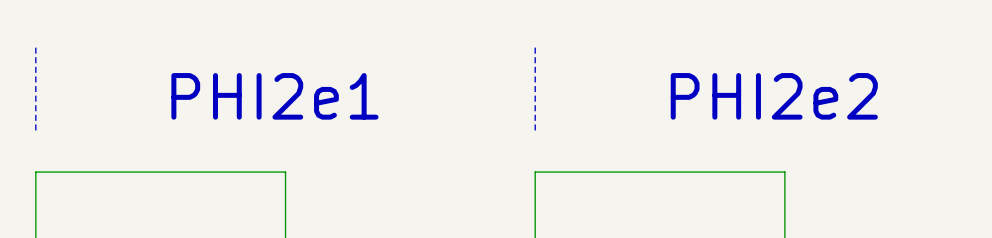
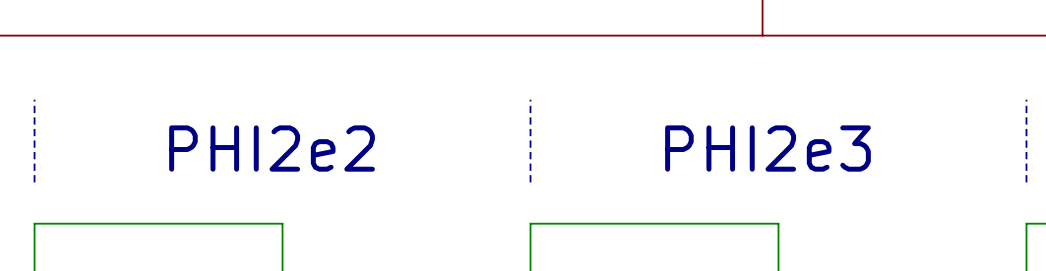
text: PHI2e1 (274, 96) -> PHI2e2 (272, 148)
text: PHI2e2 (774, 96) -> PHI2e3 (767, 148)

